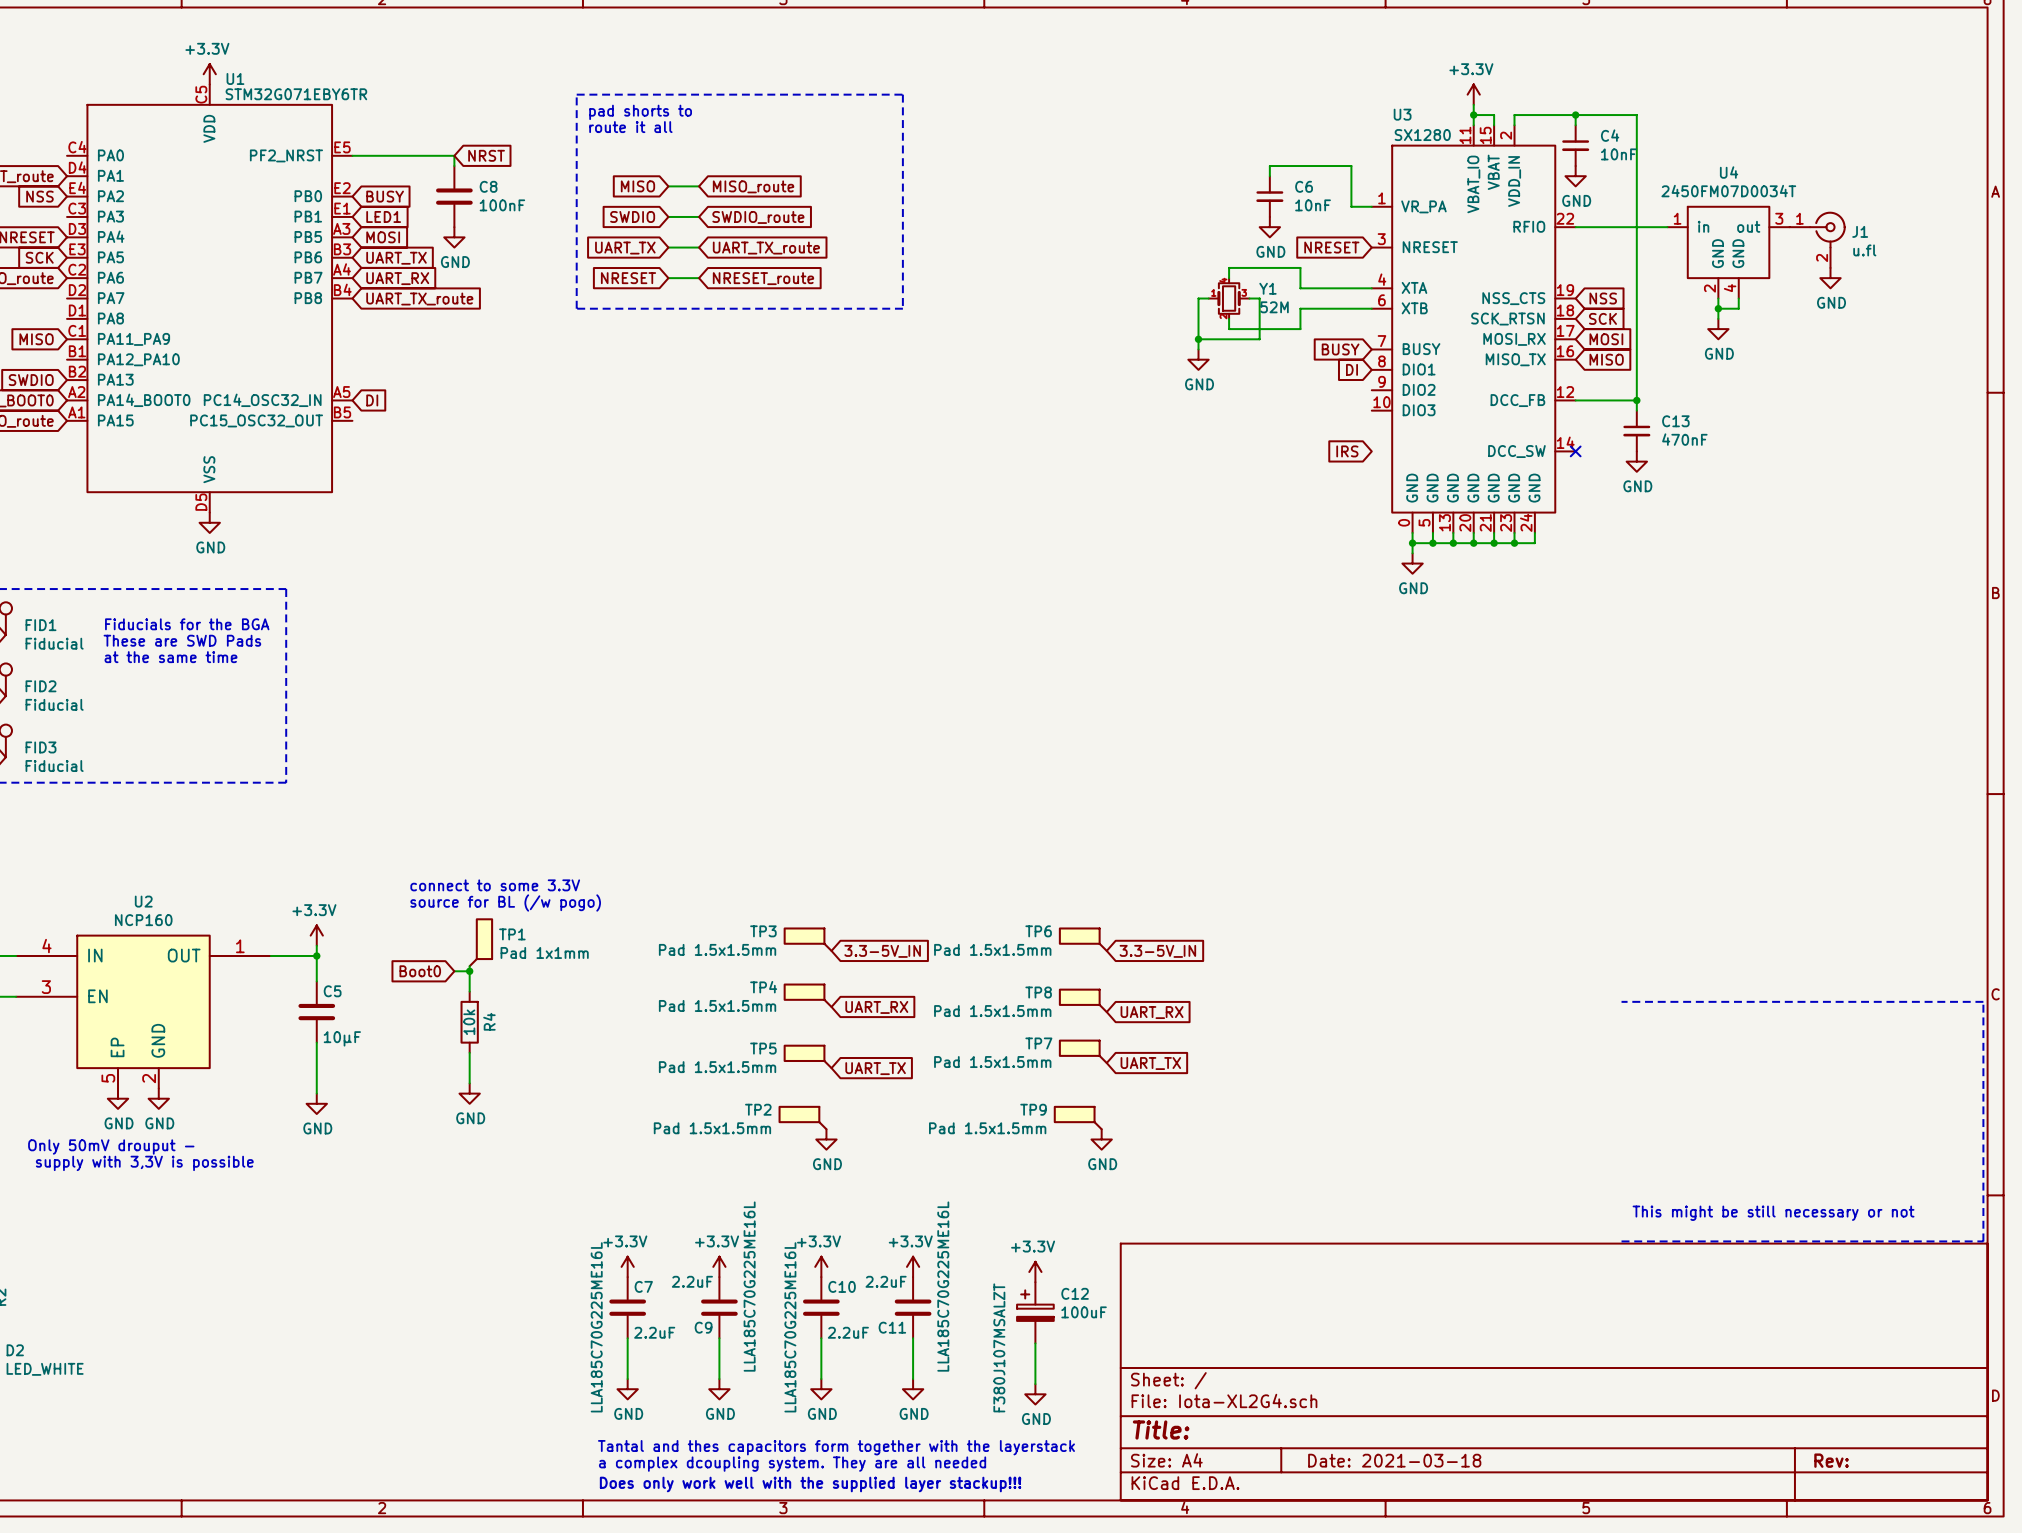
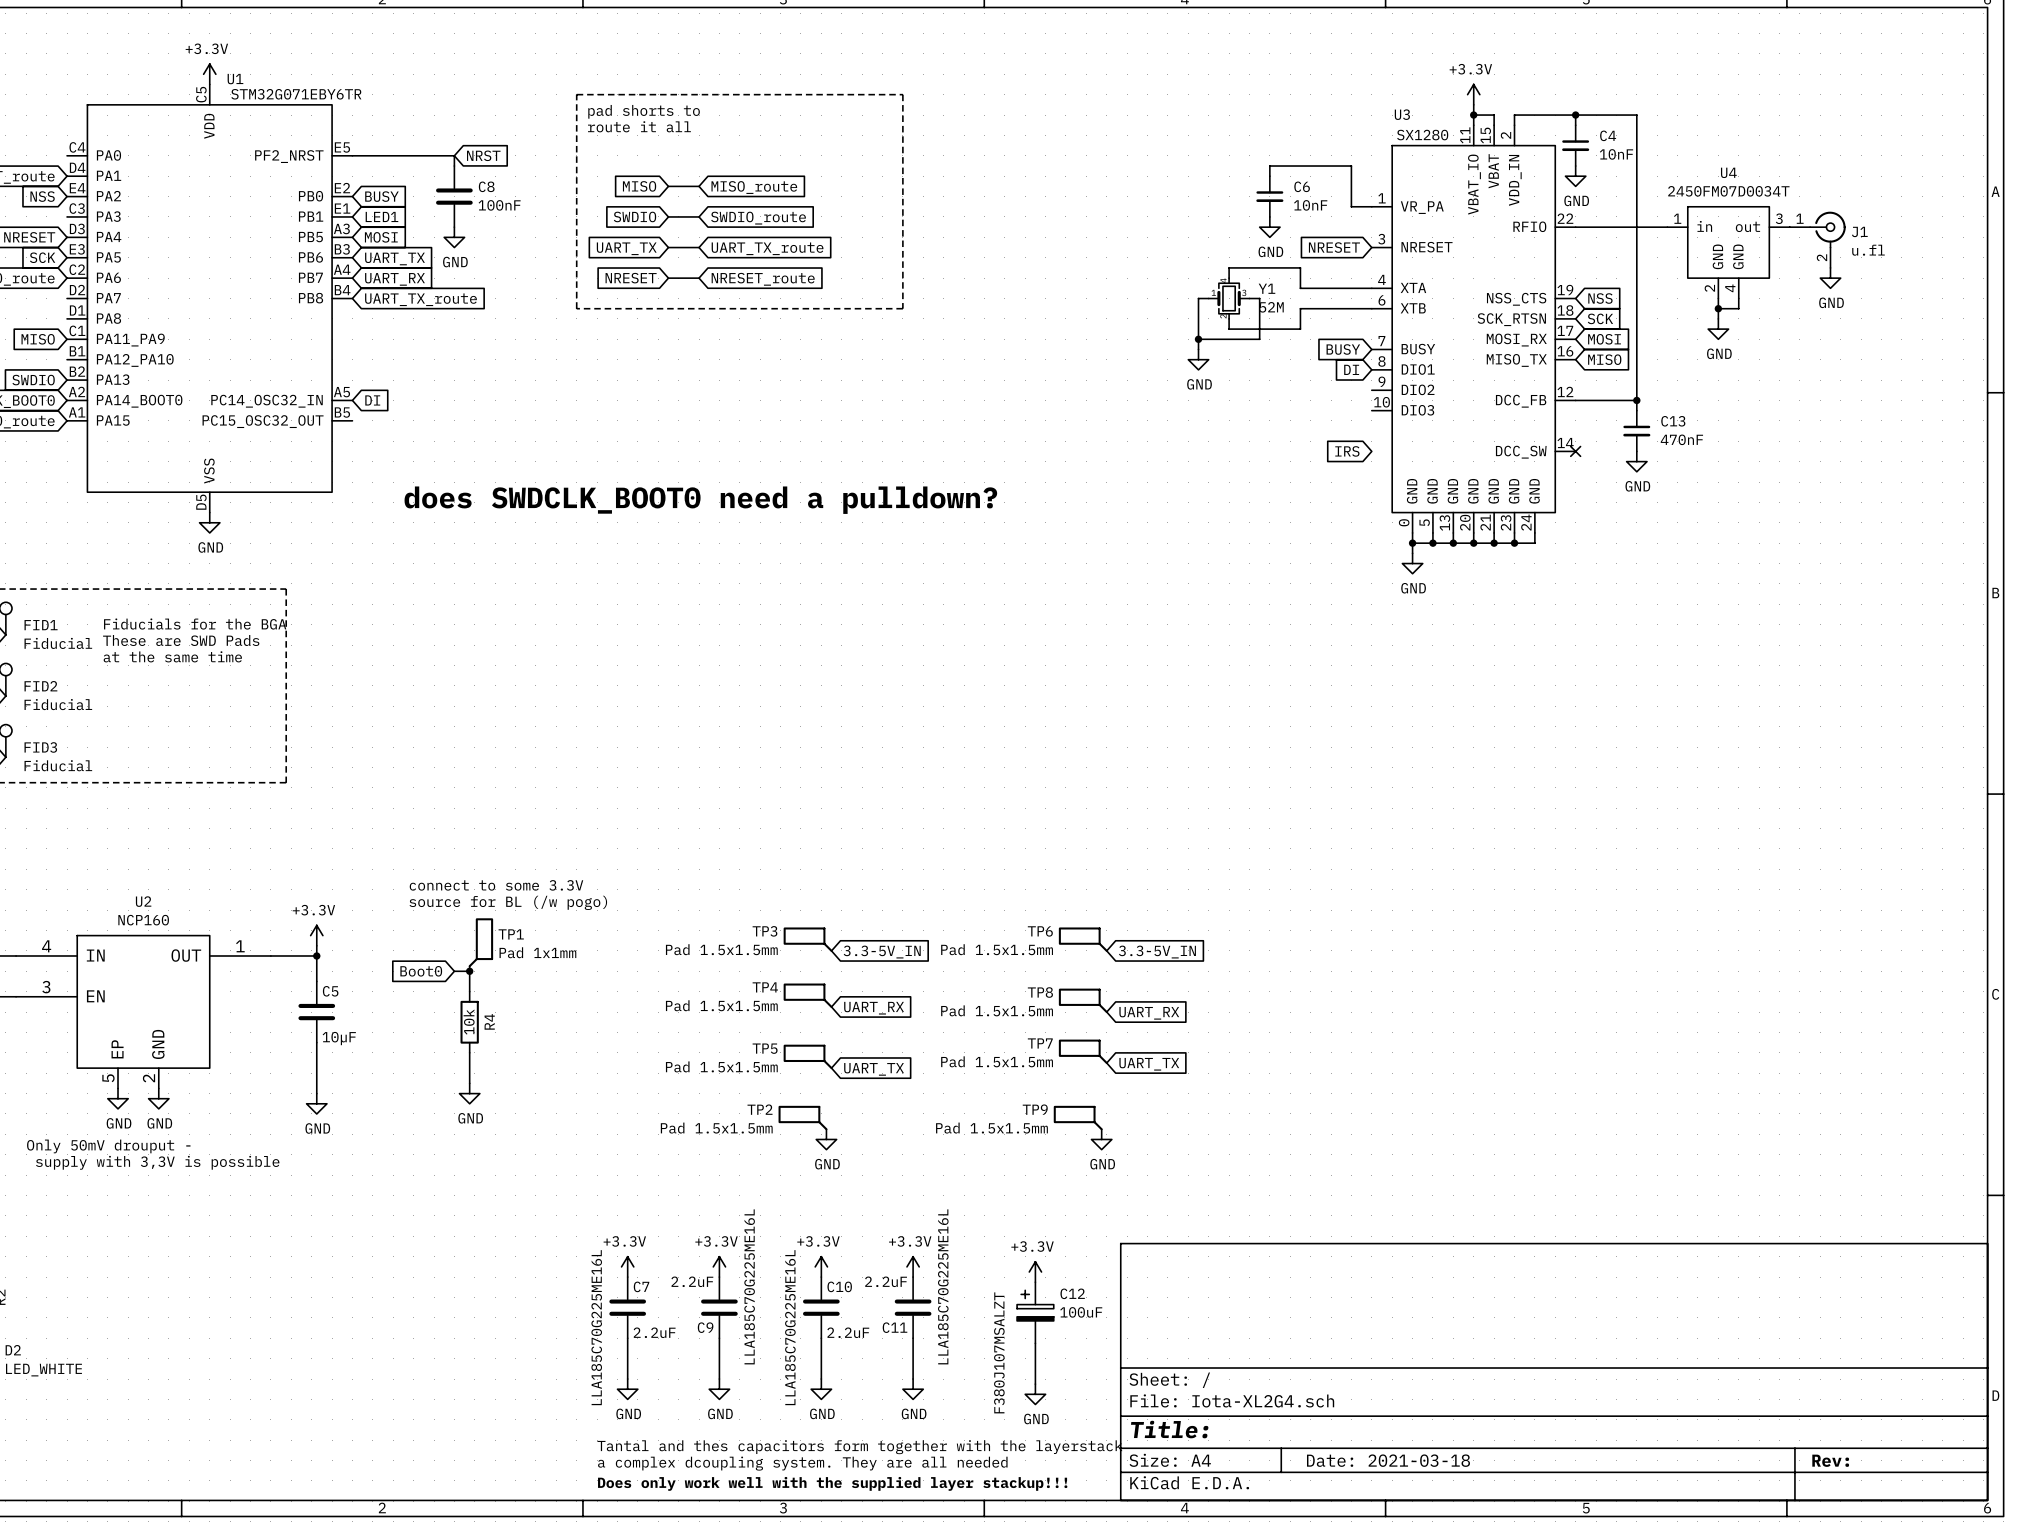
text: none -> does SWDCLK_BOOT0 need a pulldown? (700, 500)
line: (1621, 1001) (1983, 1001) (1983, 1241) (1621, 1241) -> none
text: This might be still necessary or not (1773, 1213) -> none

